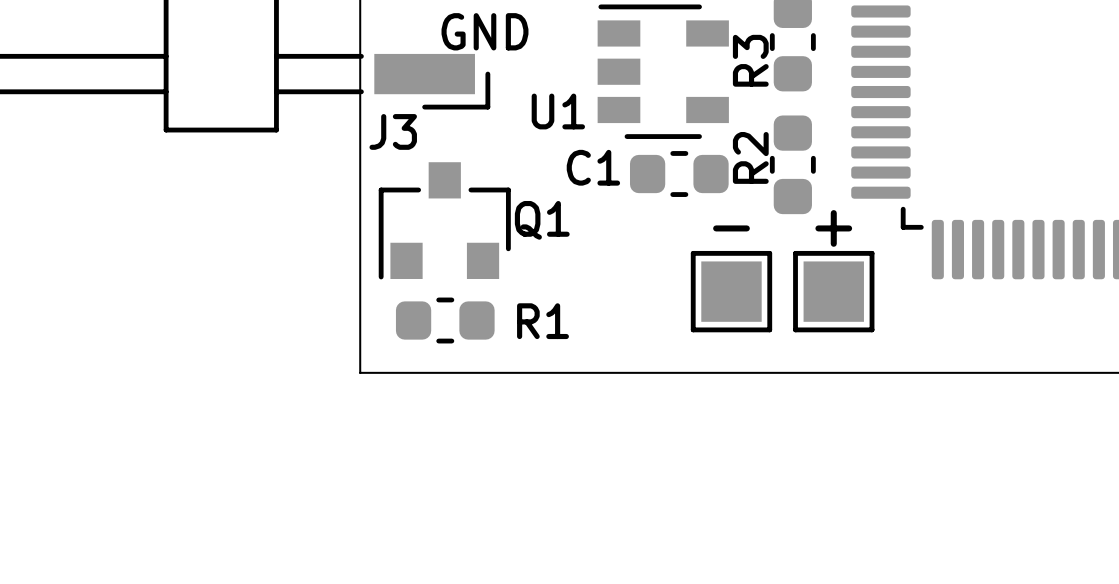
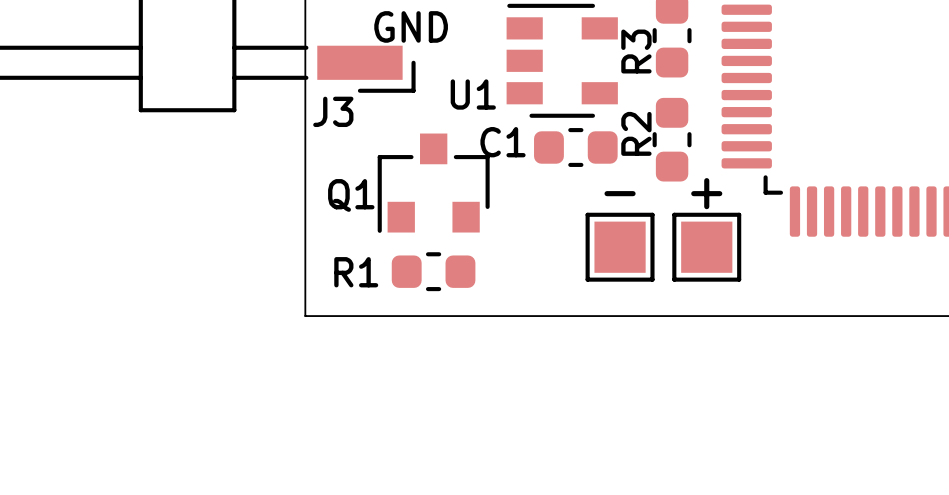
Q1 position: (444, 220) -> (433, 183)
Q1 name position: Q1 (542, 220) -> Q1 (351, 195)
R1 position: (445, 320) -> (433, 271)
R1 name position: R1 (542, 321) -> R1 (356, 272)

